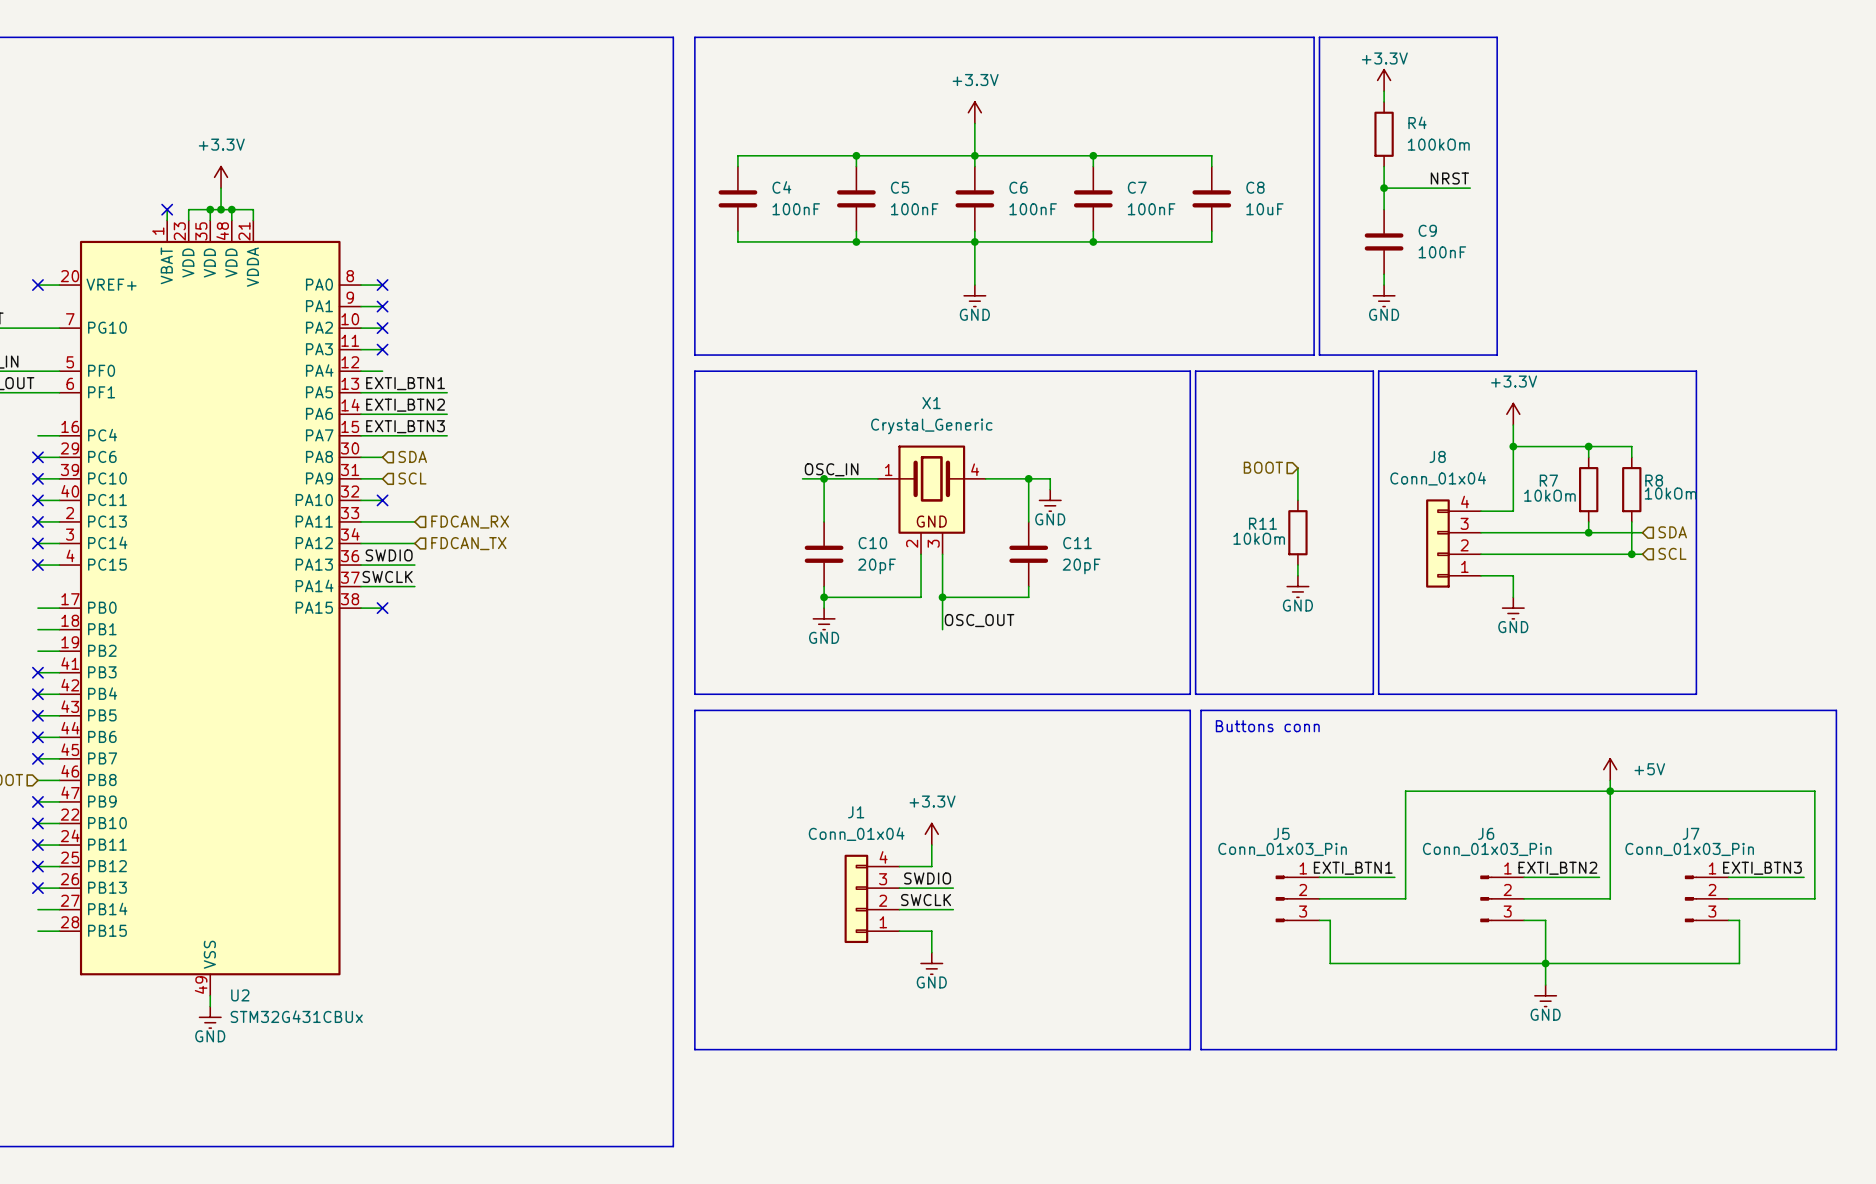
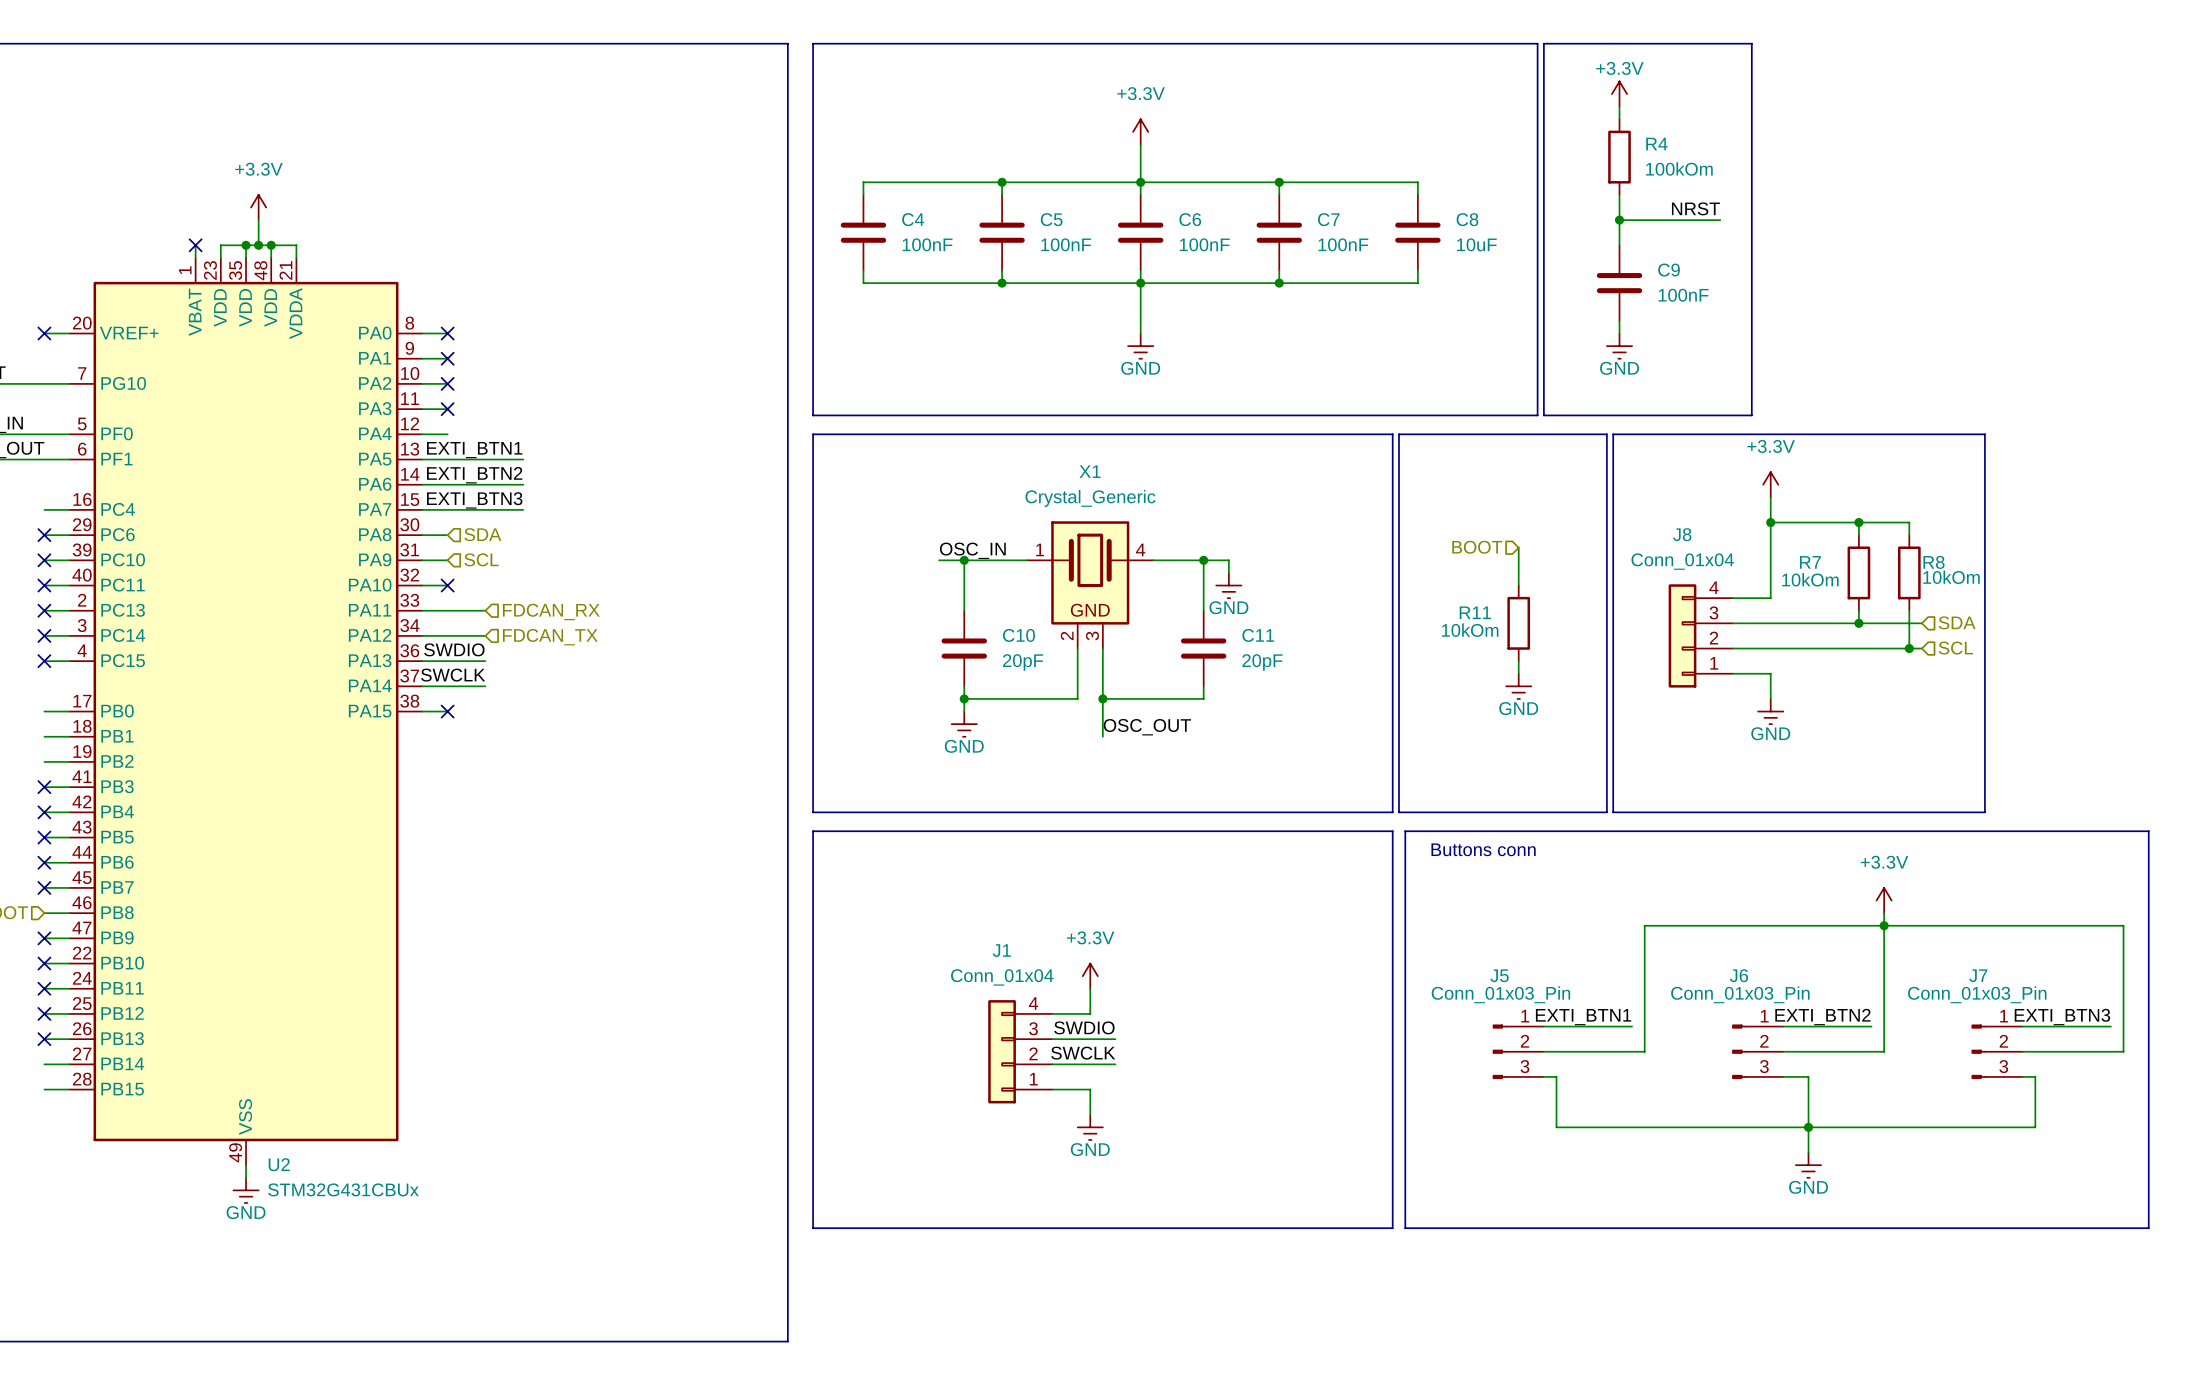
power symbol: +5V (1610, 769) -> +3.3V (1884, 900)

